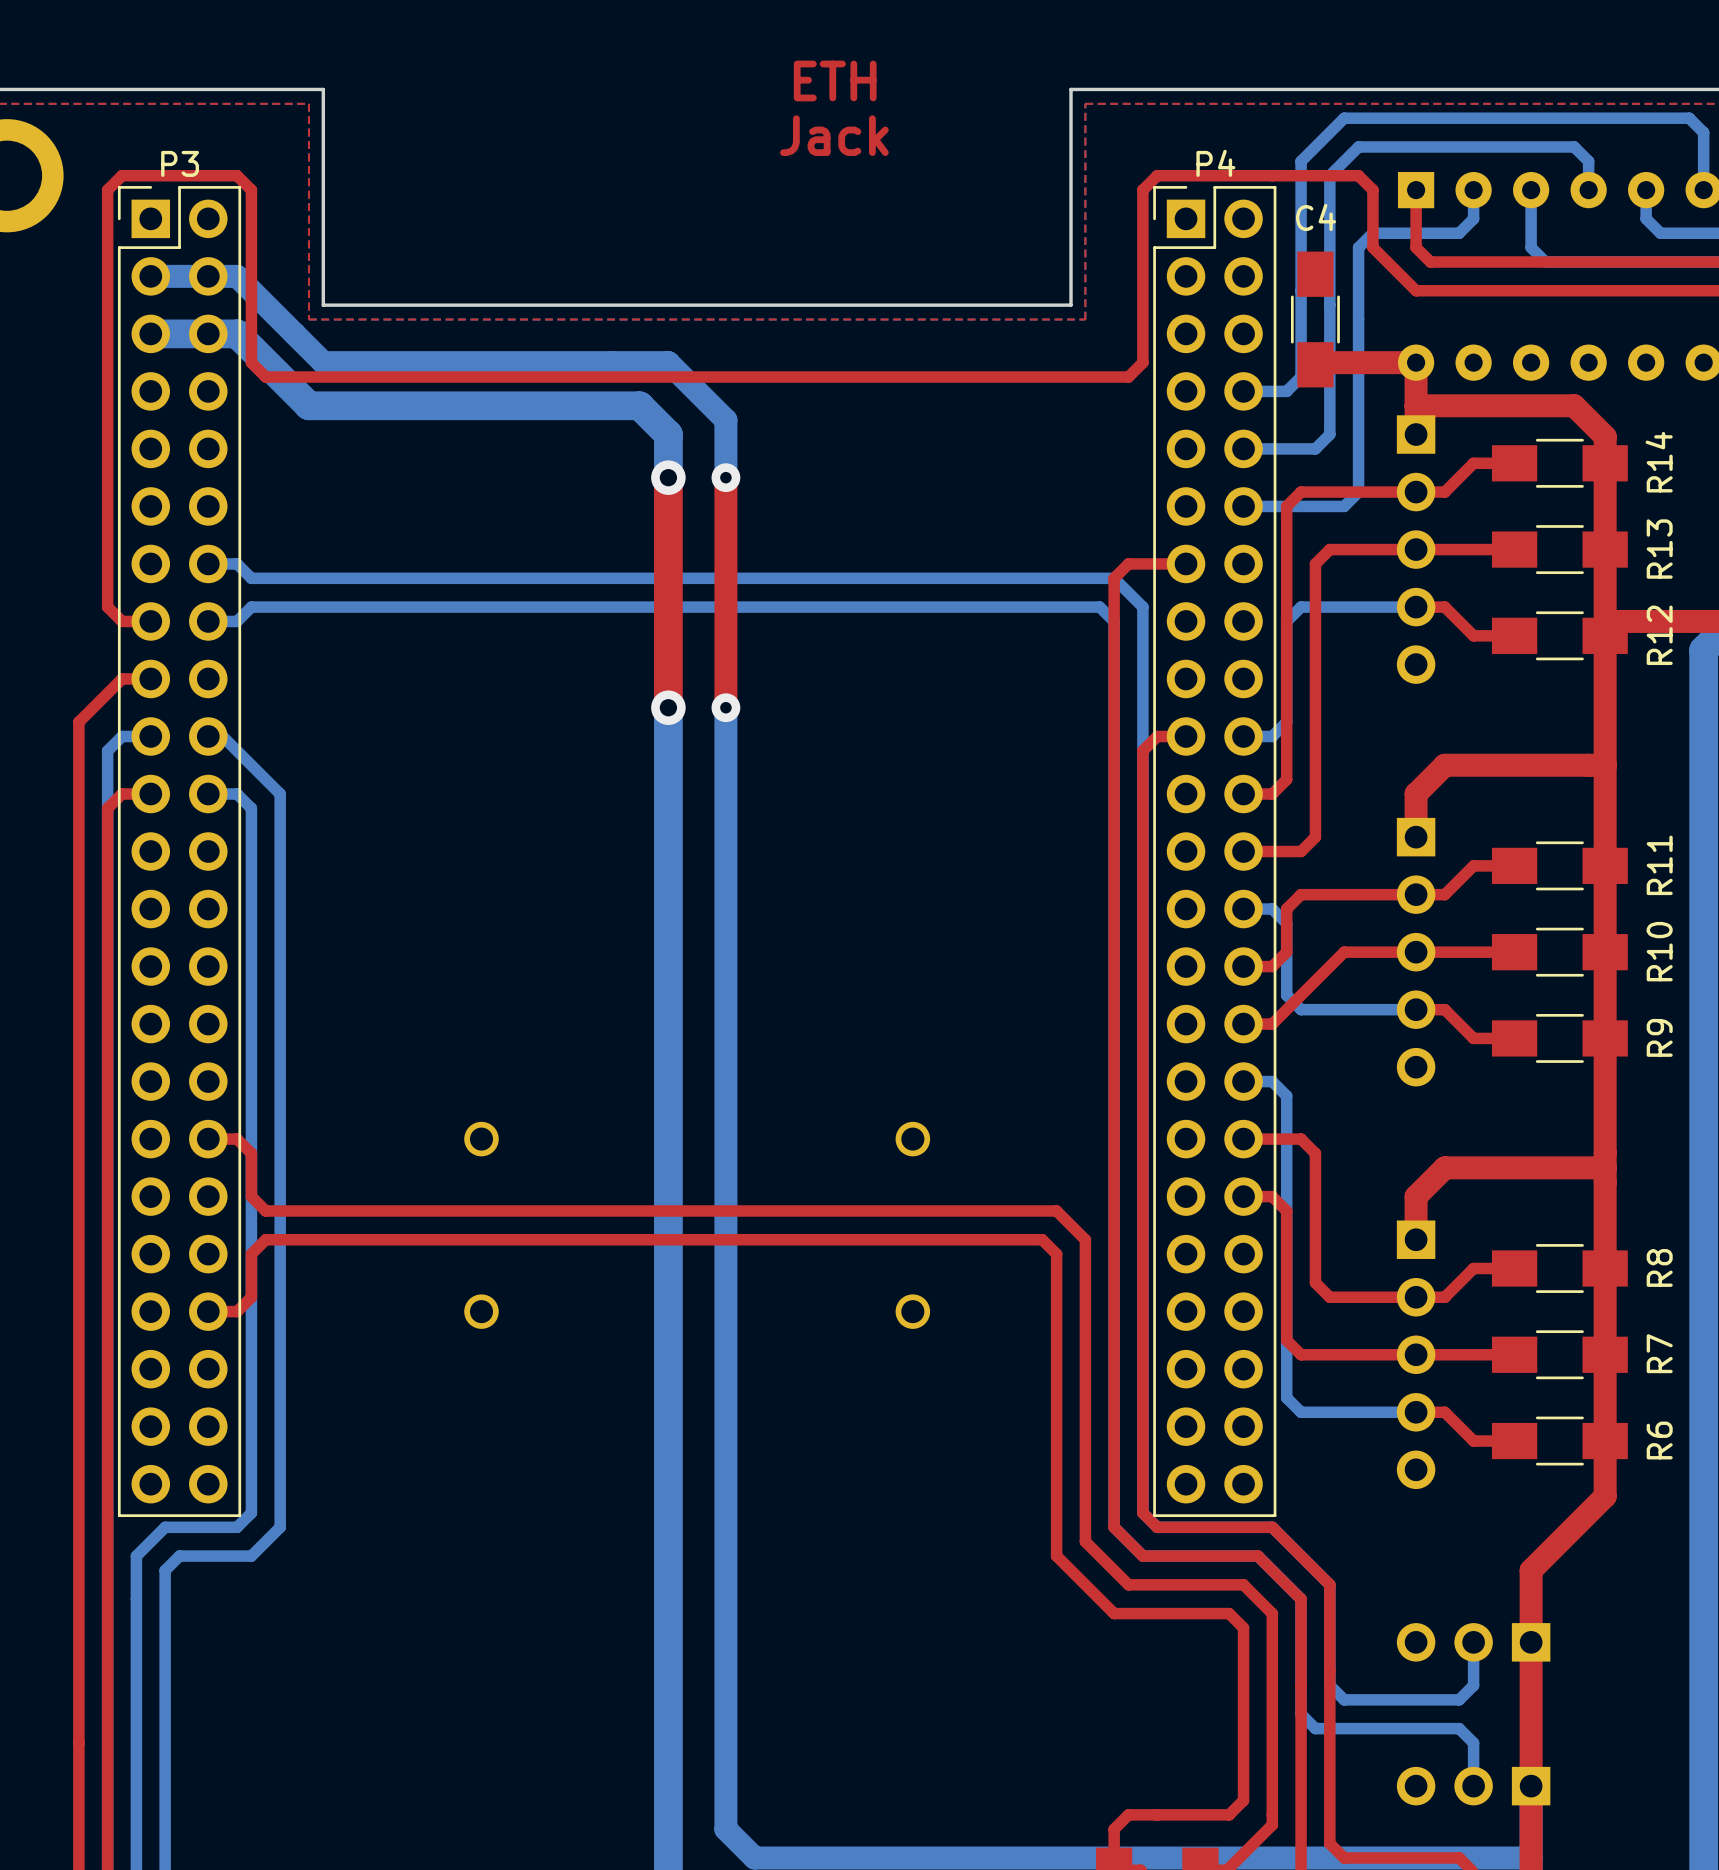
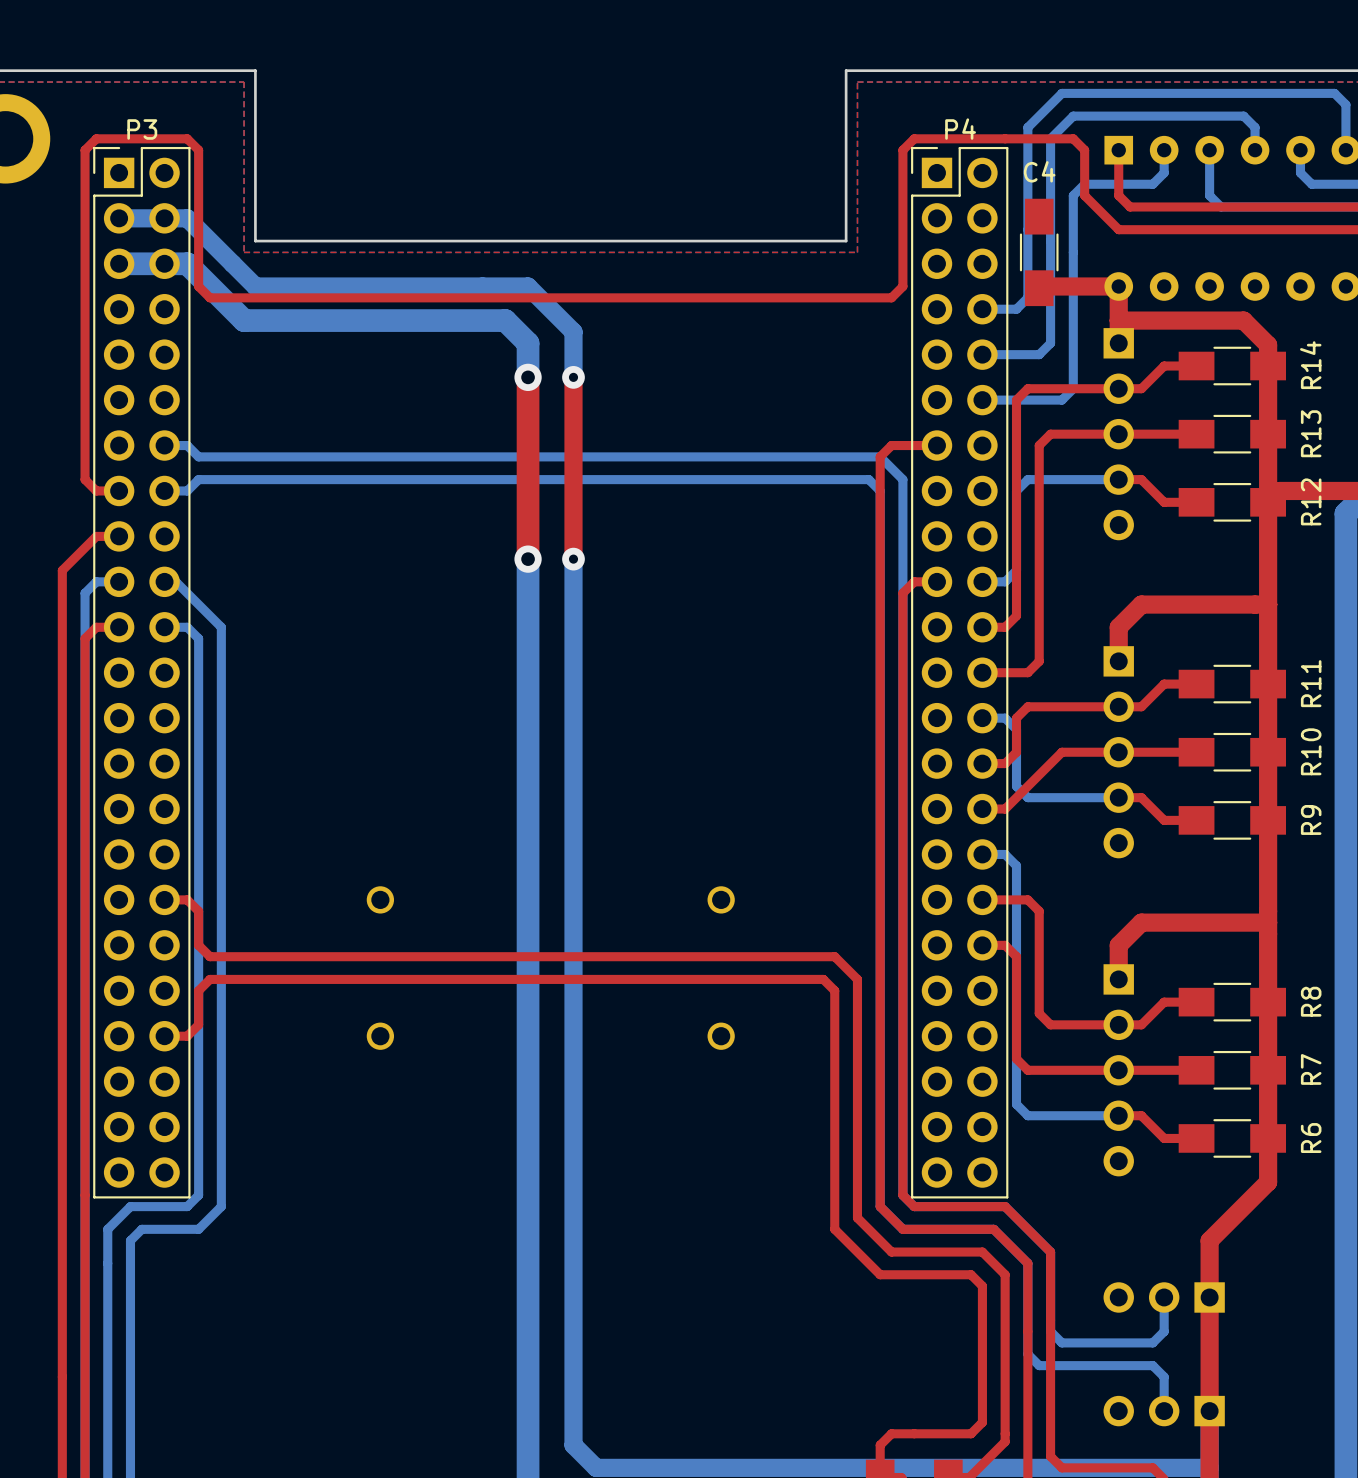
text: ETH (835, 80) -> none
text: Jack (834, 135) -> none

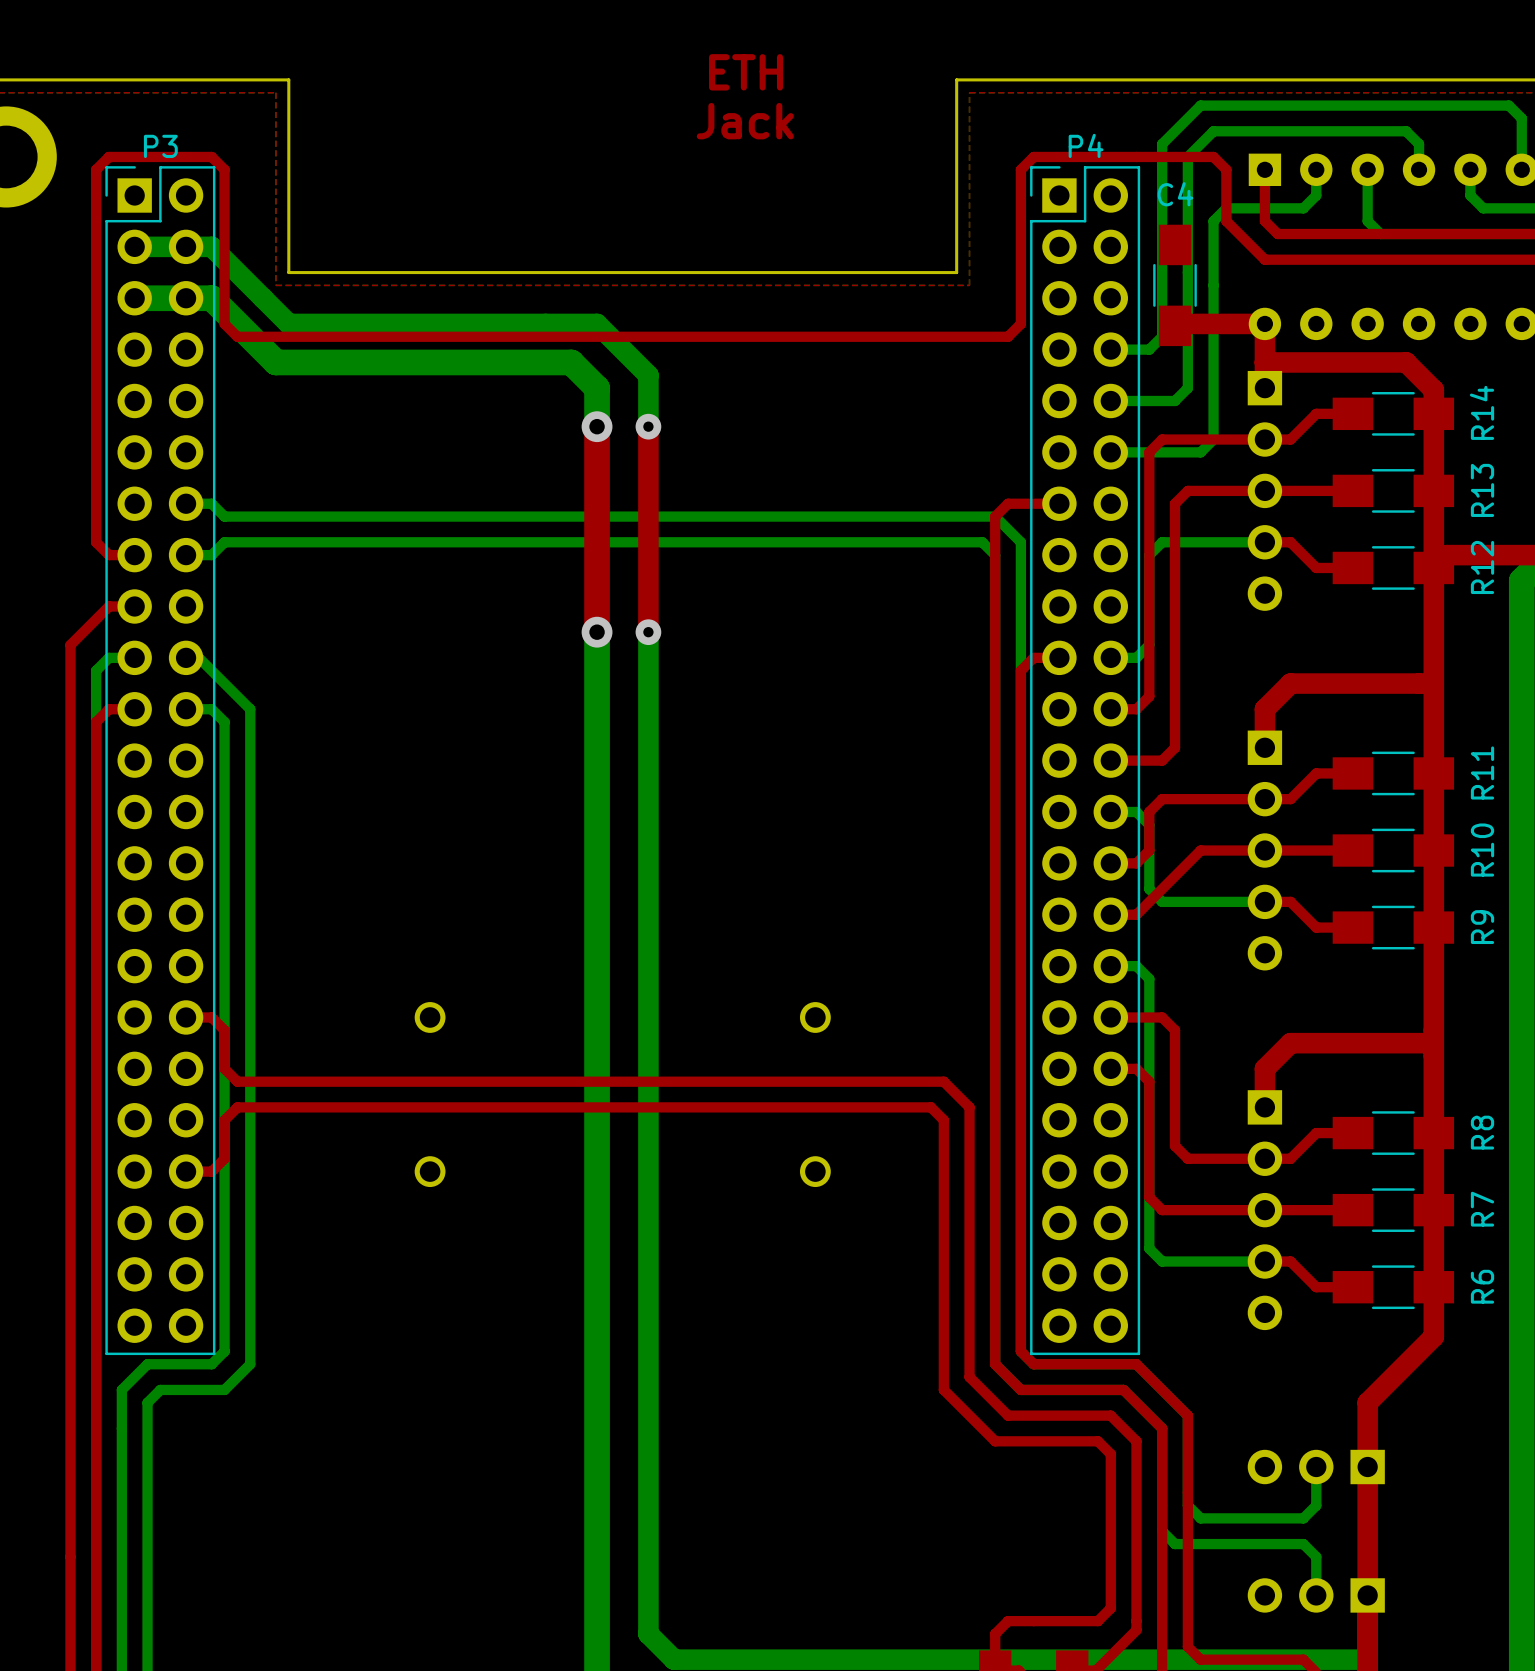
text: none -> ETH (746, 72)
text: none -> Jack (745, 121)

